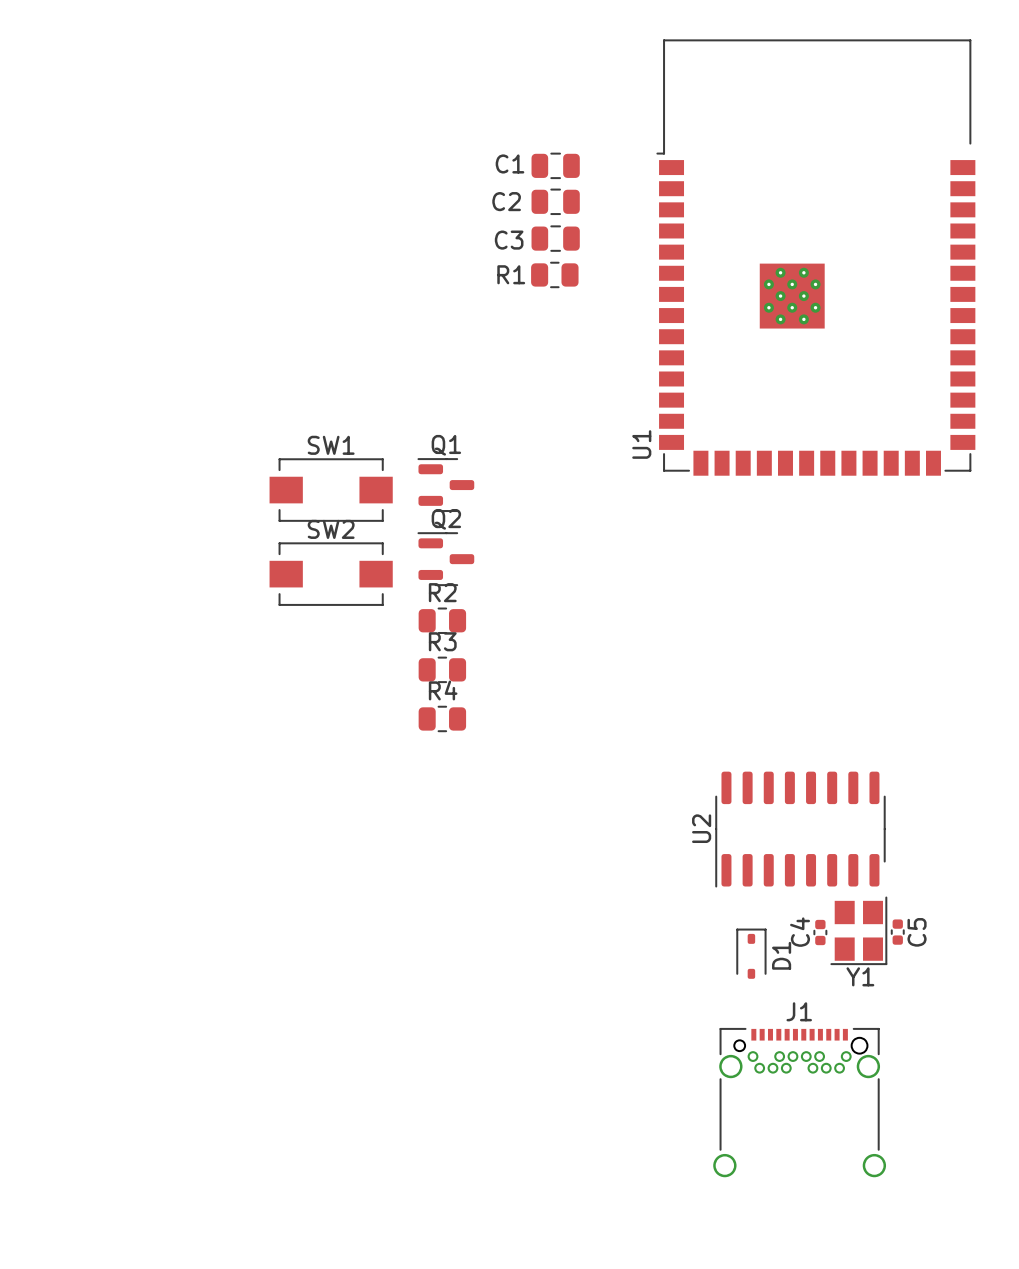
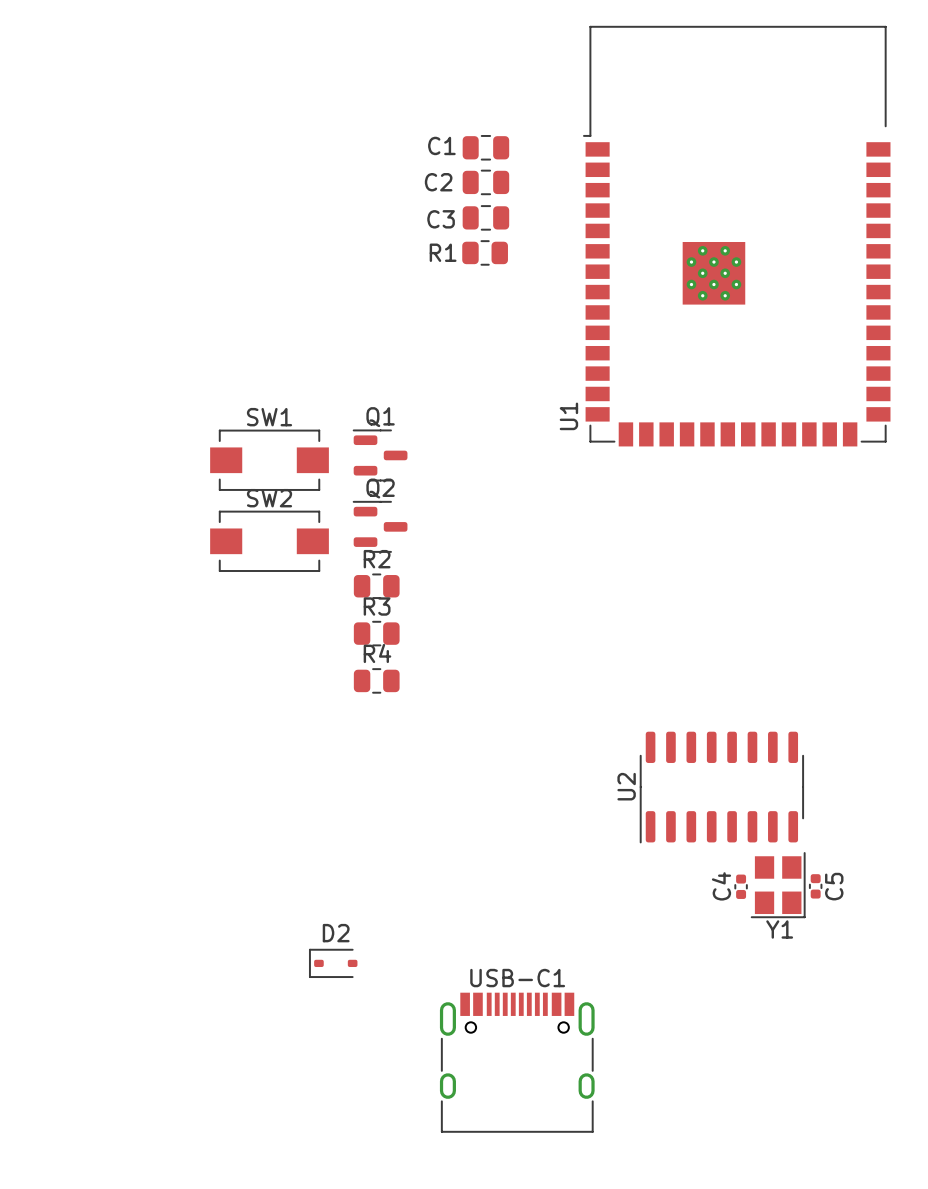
D1: (751, 953) -> none
D2: none -> (333, 963)
J1: (799, 1102) -> none
USB-C1: none -> (517, 1062)

